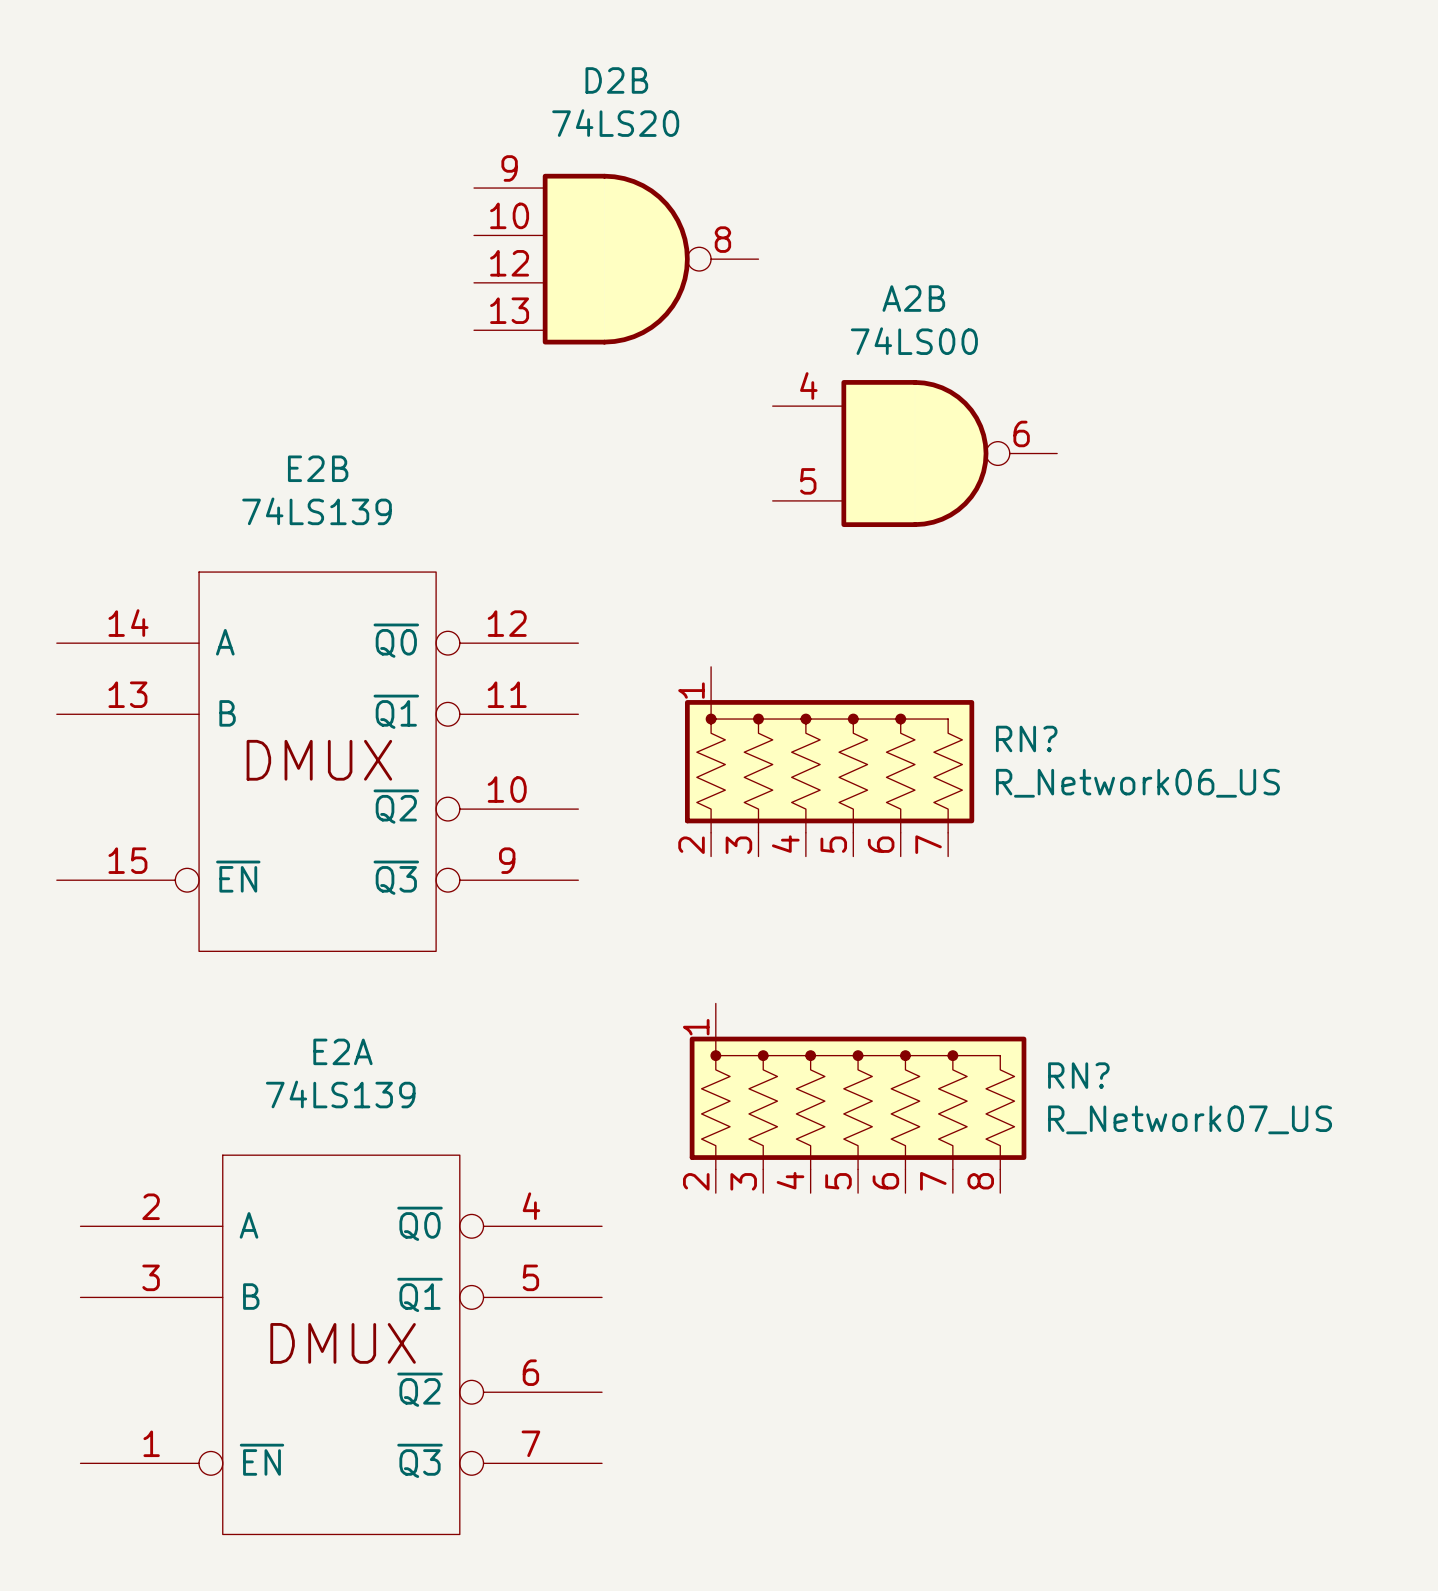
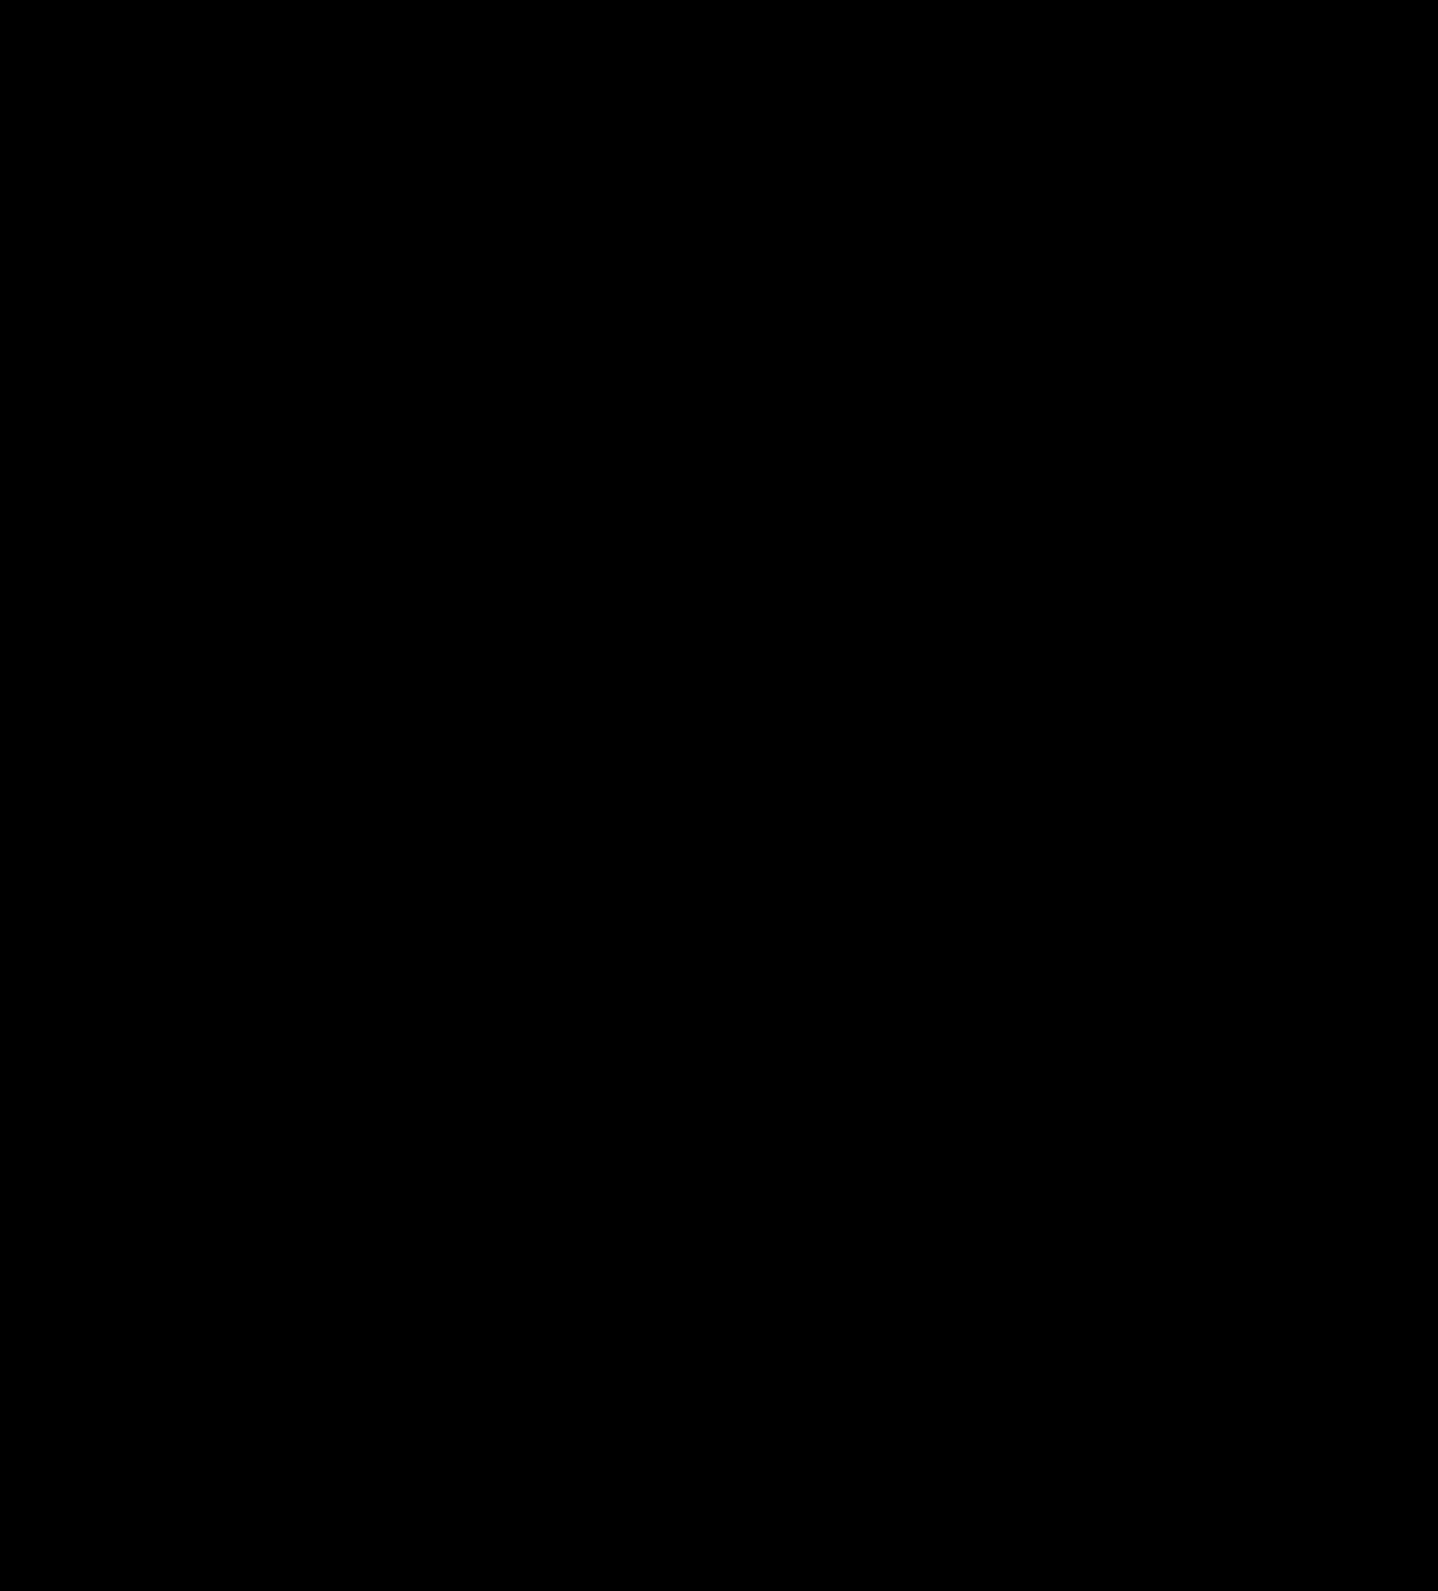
D2B: 74LS20 (616, 259) -> none
A2B: 74LS00 (914, 453) -> none
E2B: 74LS139 (317, 761) -> none
RN?: R_Network06_US (829, 761) -> none
RN?: R_Network07_US (858, 1098) -> none
E2A: 74LS139 (341, 1344) -> none

